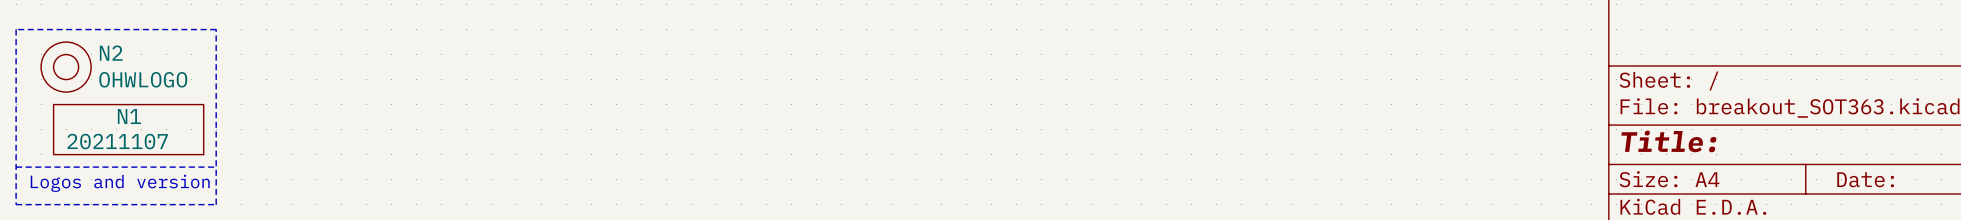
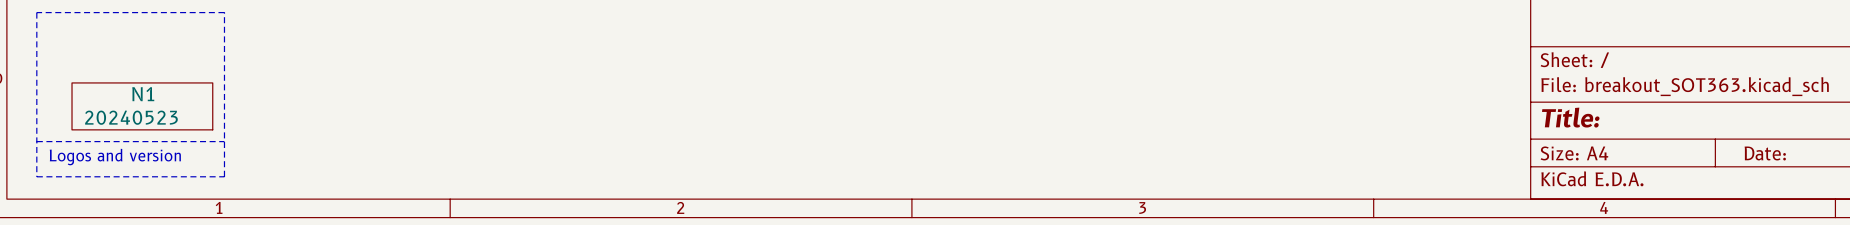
N2: OHWLOGO (66, 67) -> none
N1 value: 20211107 (117, 141) -> 20240523 (131, 117)

